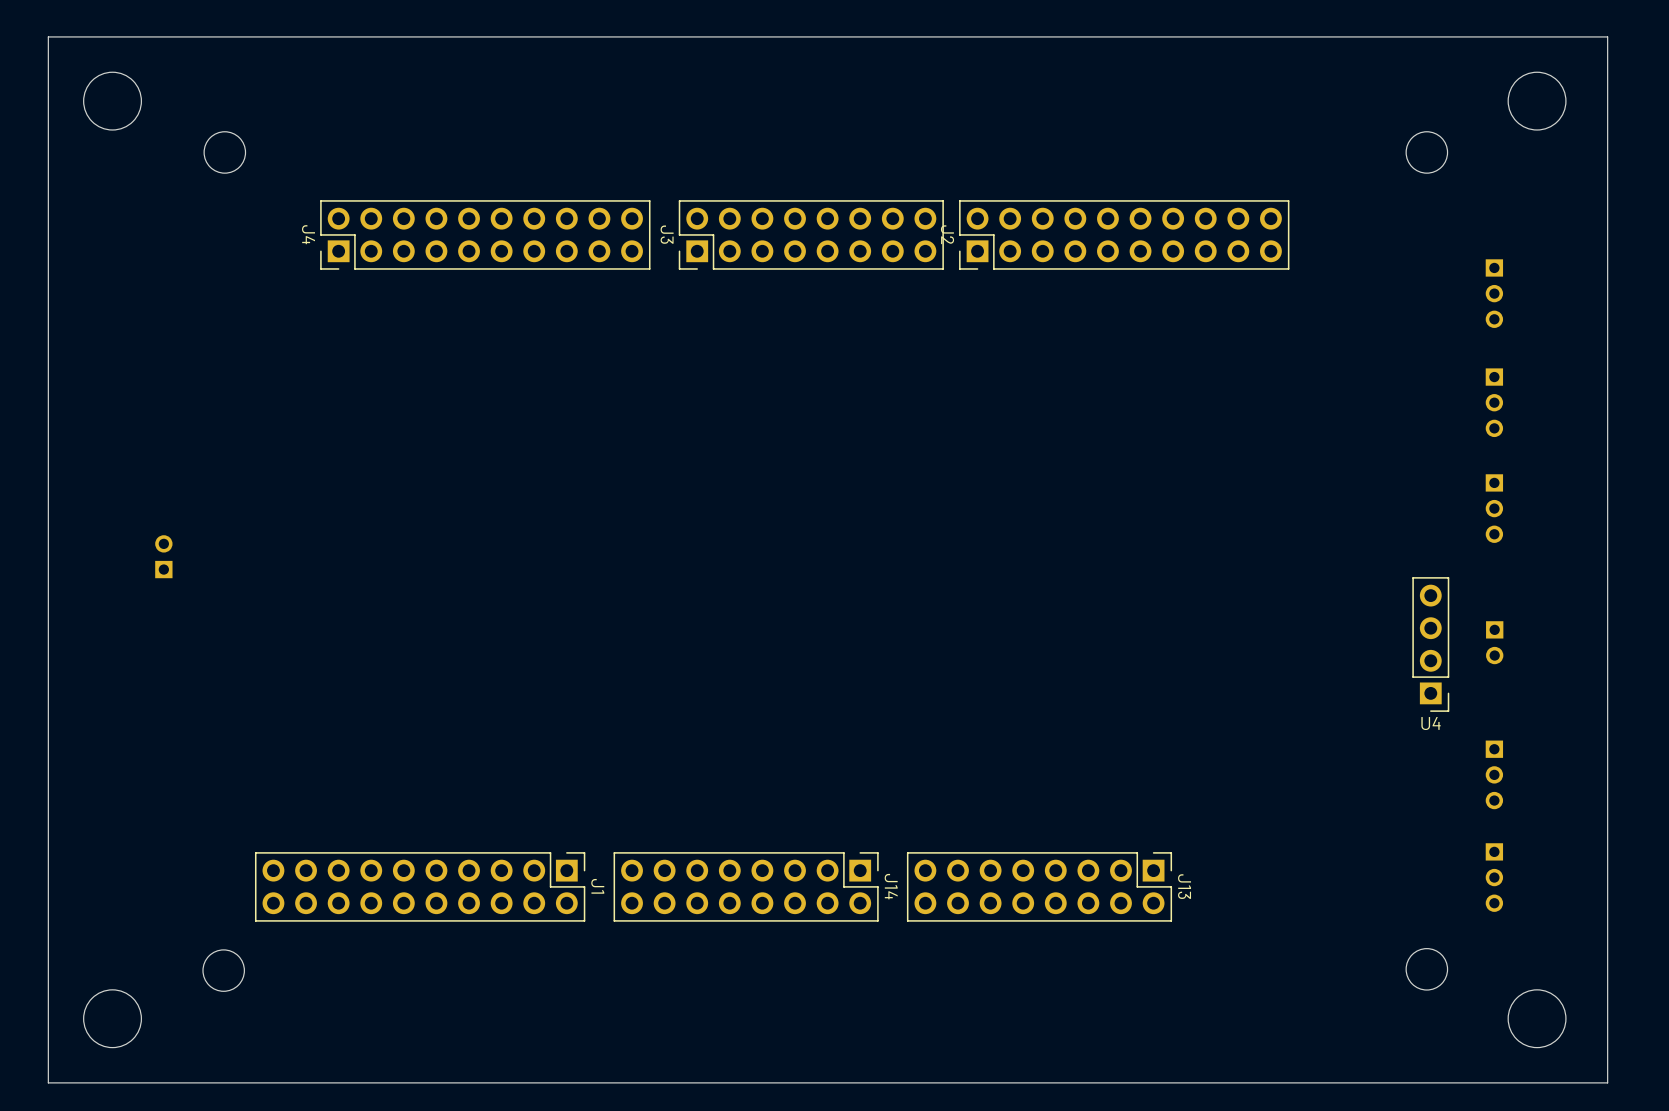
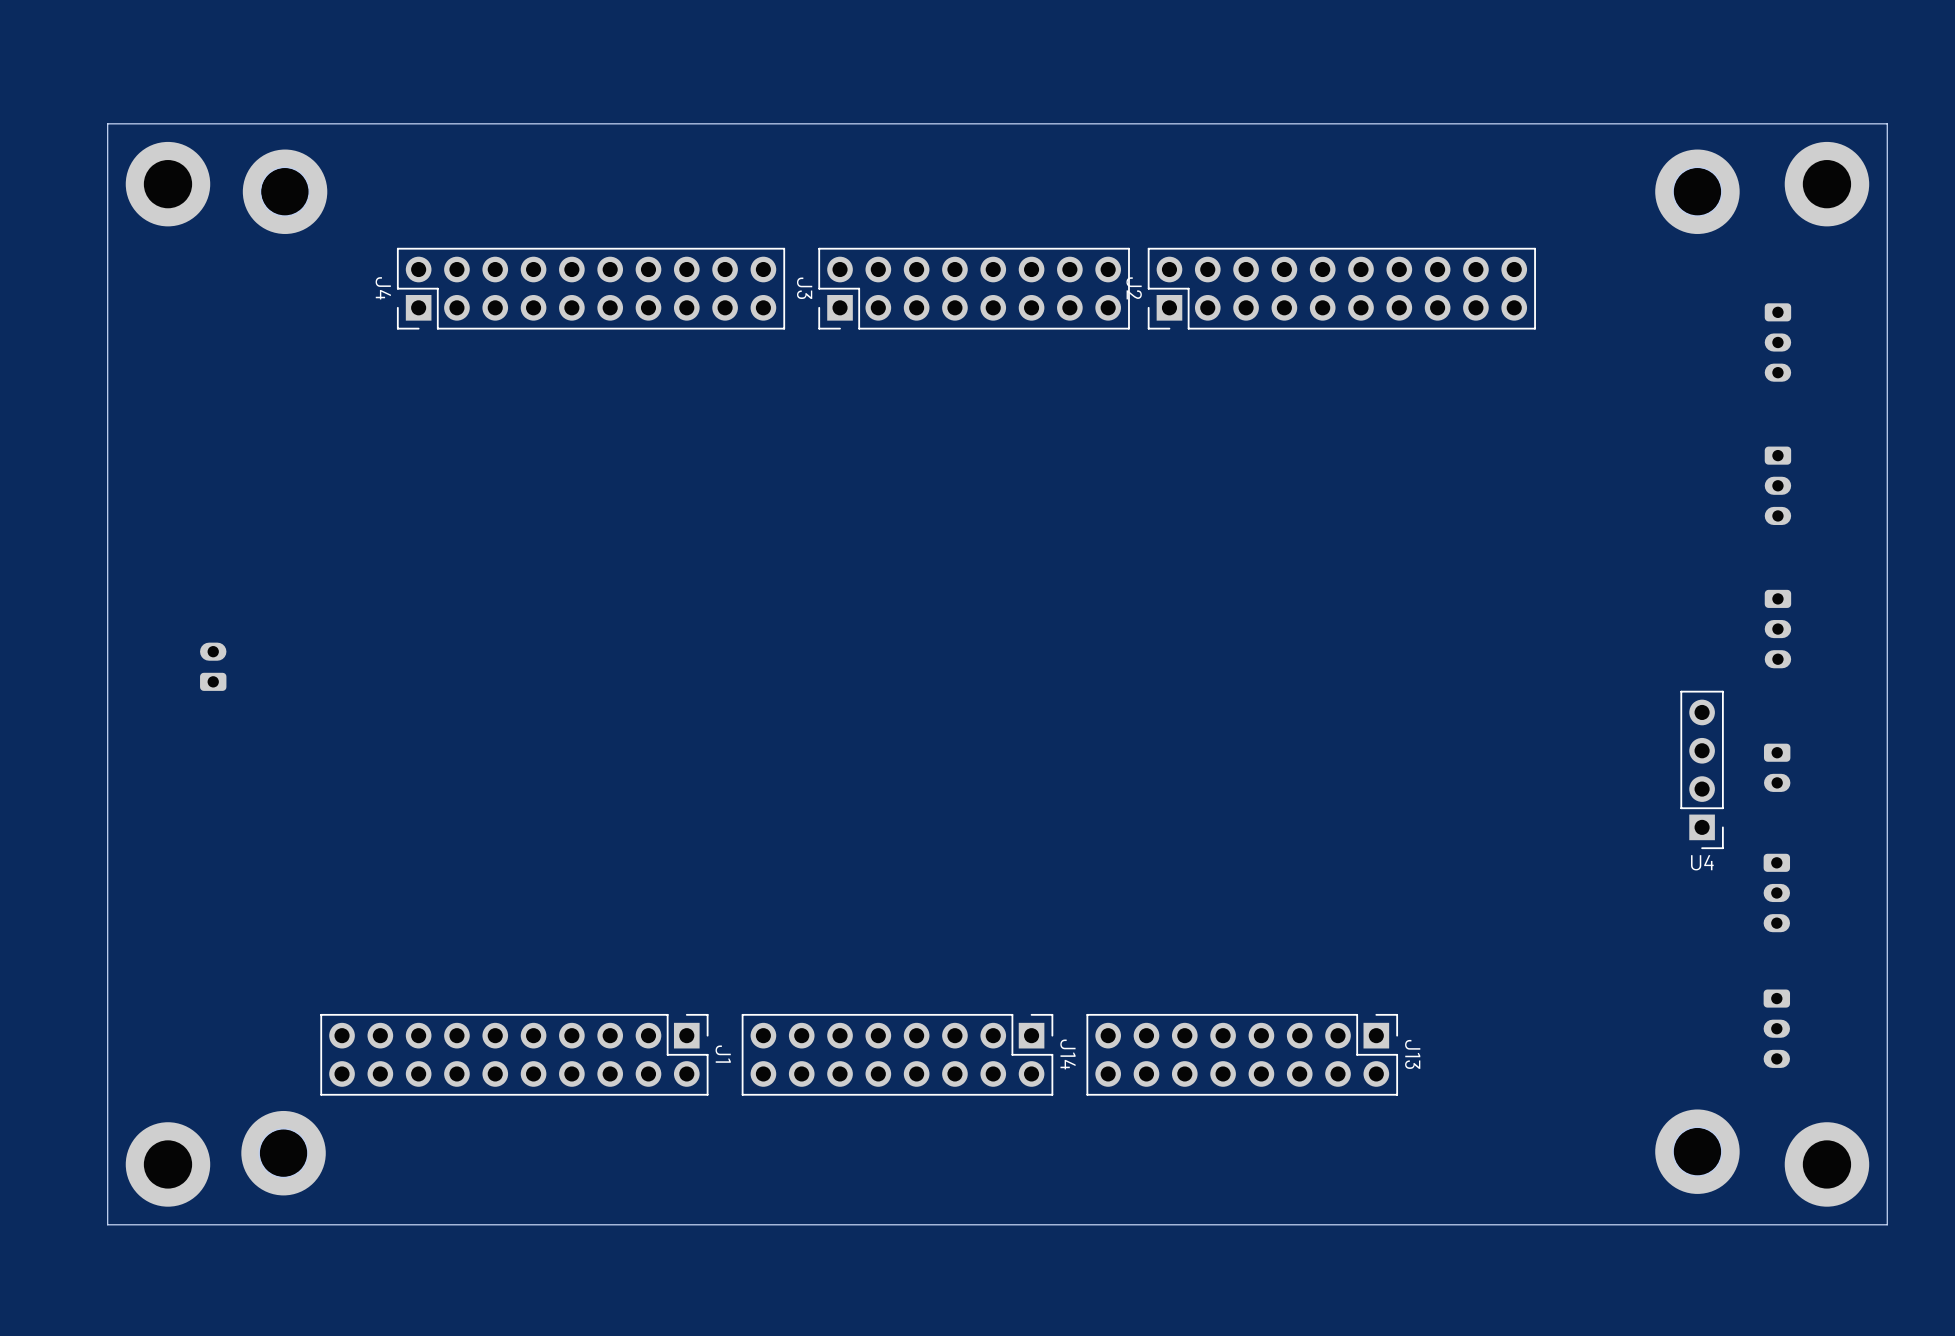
board edge: (1607, 36) (48, 36) (48, 1082) (1607, 1082) (1607, 36) -> (1887, 123) (1887, 1224) (107, 1224) (107, 123) (1887, 123)
round board edge: [83, 71, 142, 131] -> none
round board edge: [1507, 71, 1567, 131] -> none
part: none -> (167, 184)
part: none -> (1826, 184)
part: none -> (285, 191)
part: none -> (1697, 191)
part: none -> (1777, 342)
part: (1494, 293) -> none
part footprint: [1485, 368, 1504, 438] -> [1764, 446, 1792, 525]
part: (1494, 508) -> none
part: none -> (1777, 629)
part footprint: [155, 535, 173, 579] -> [200, 642, 227, 691]
part footprint: [1486, 621, 1504, 665] -> [1764, 743, 1791, 792]
part: none -> (1776, 892)
part: (1494, 774) -> none
part footprint: [1485, 843, 1504, 912] -> [1763, 989, 1791, 1068]
part: none -> (1697, 1151)
part: none -> (283, 1153)
part: none -> (167, 1164)
part: none -> (1826, 1164)
round board edge: [83, 989, 142, 1048] -> none
round board edge: [1507, 989, 1567, 1048] -> none

